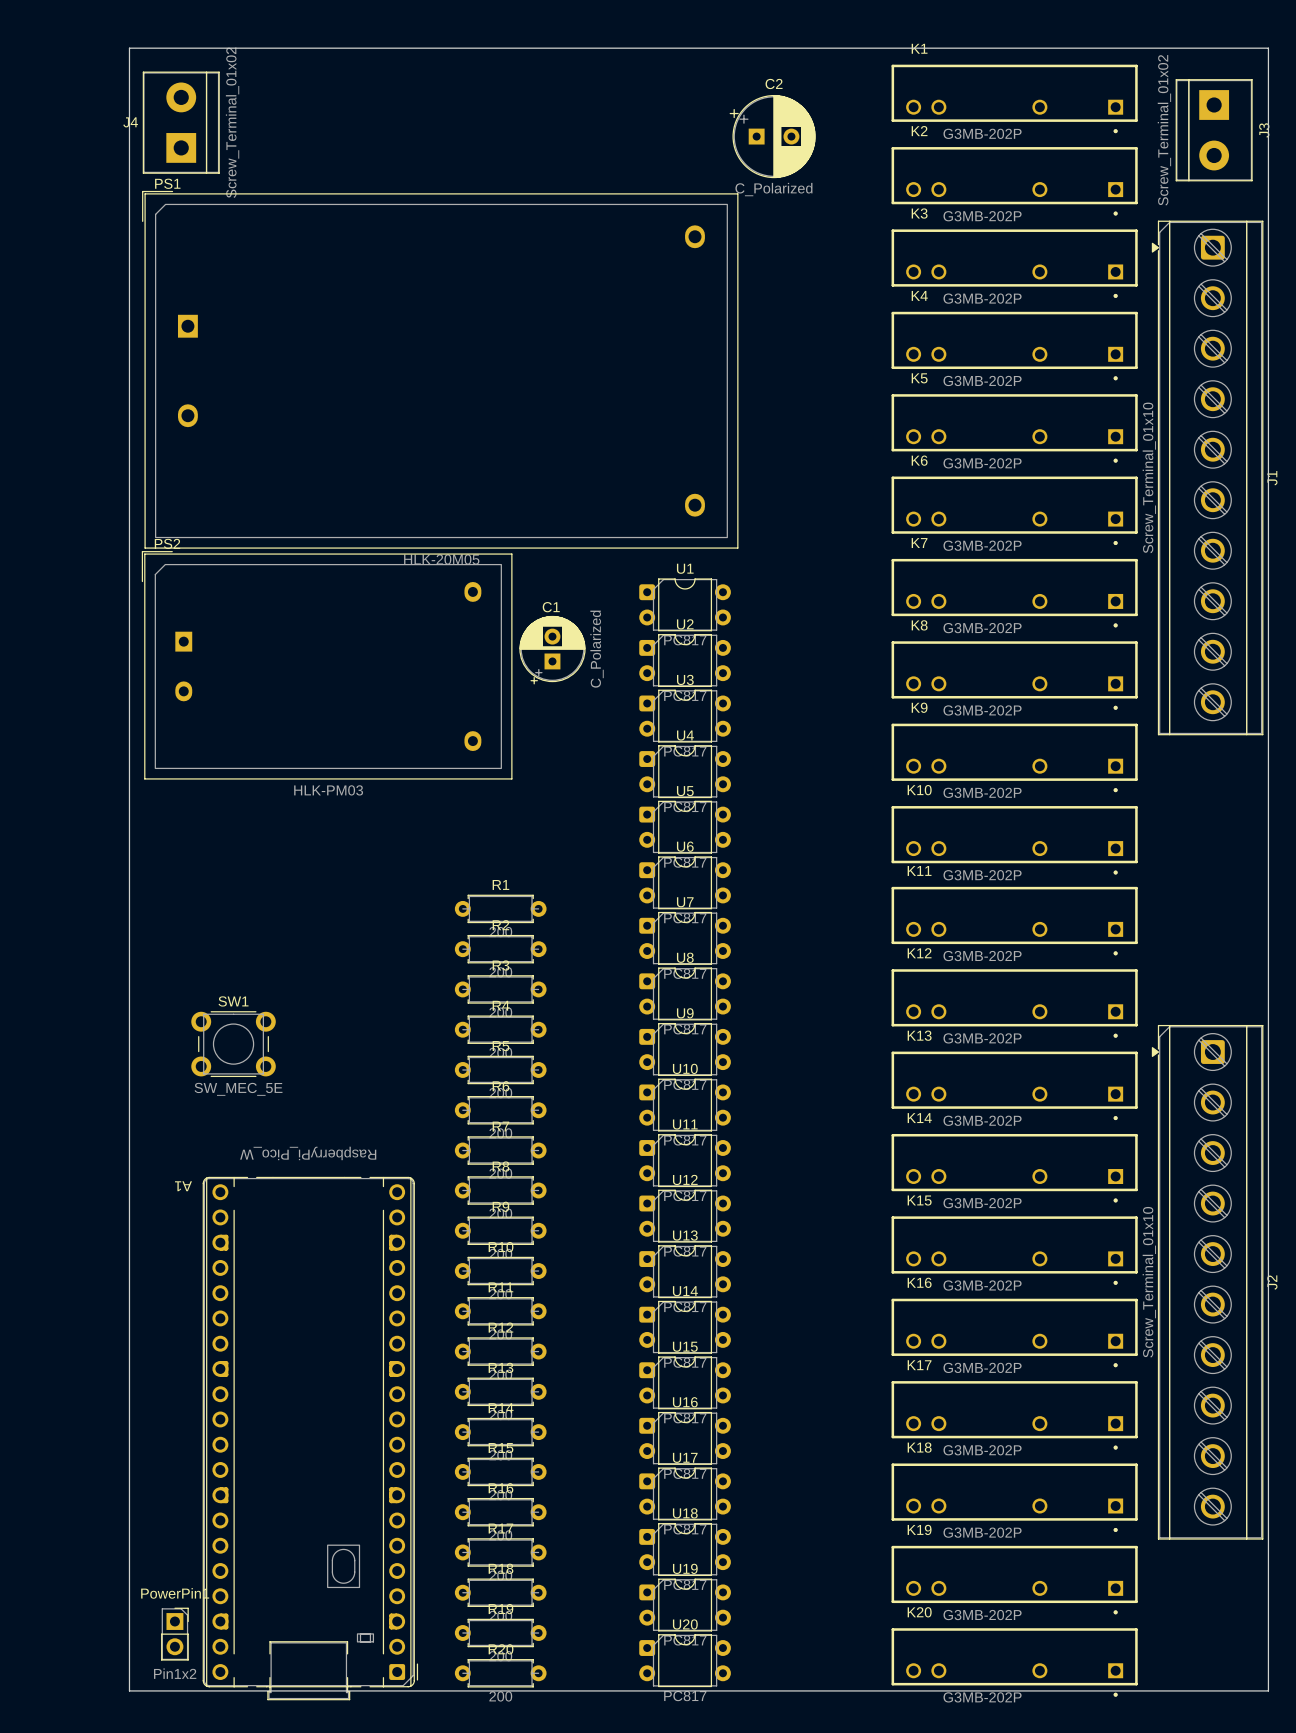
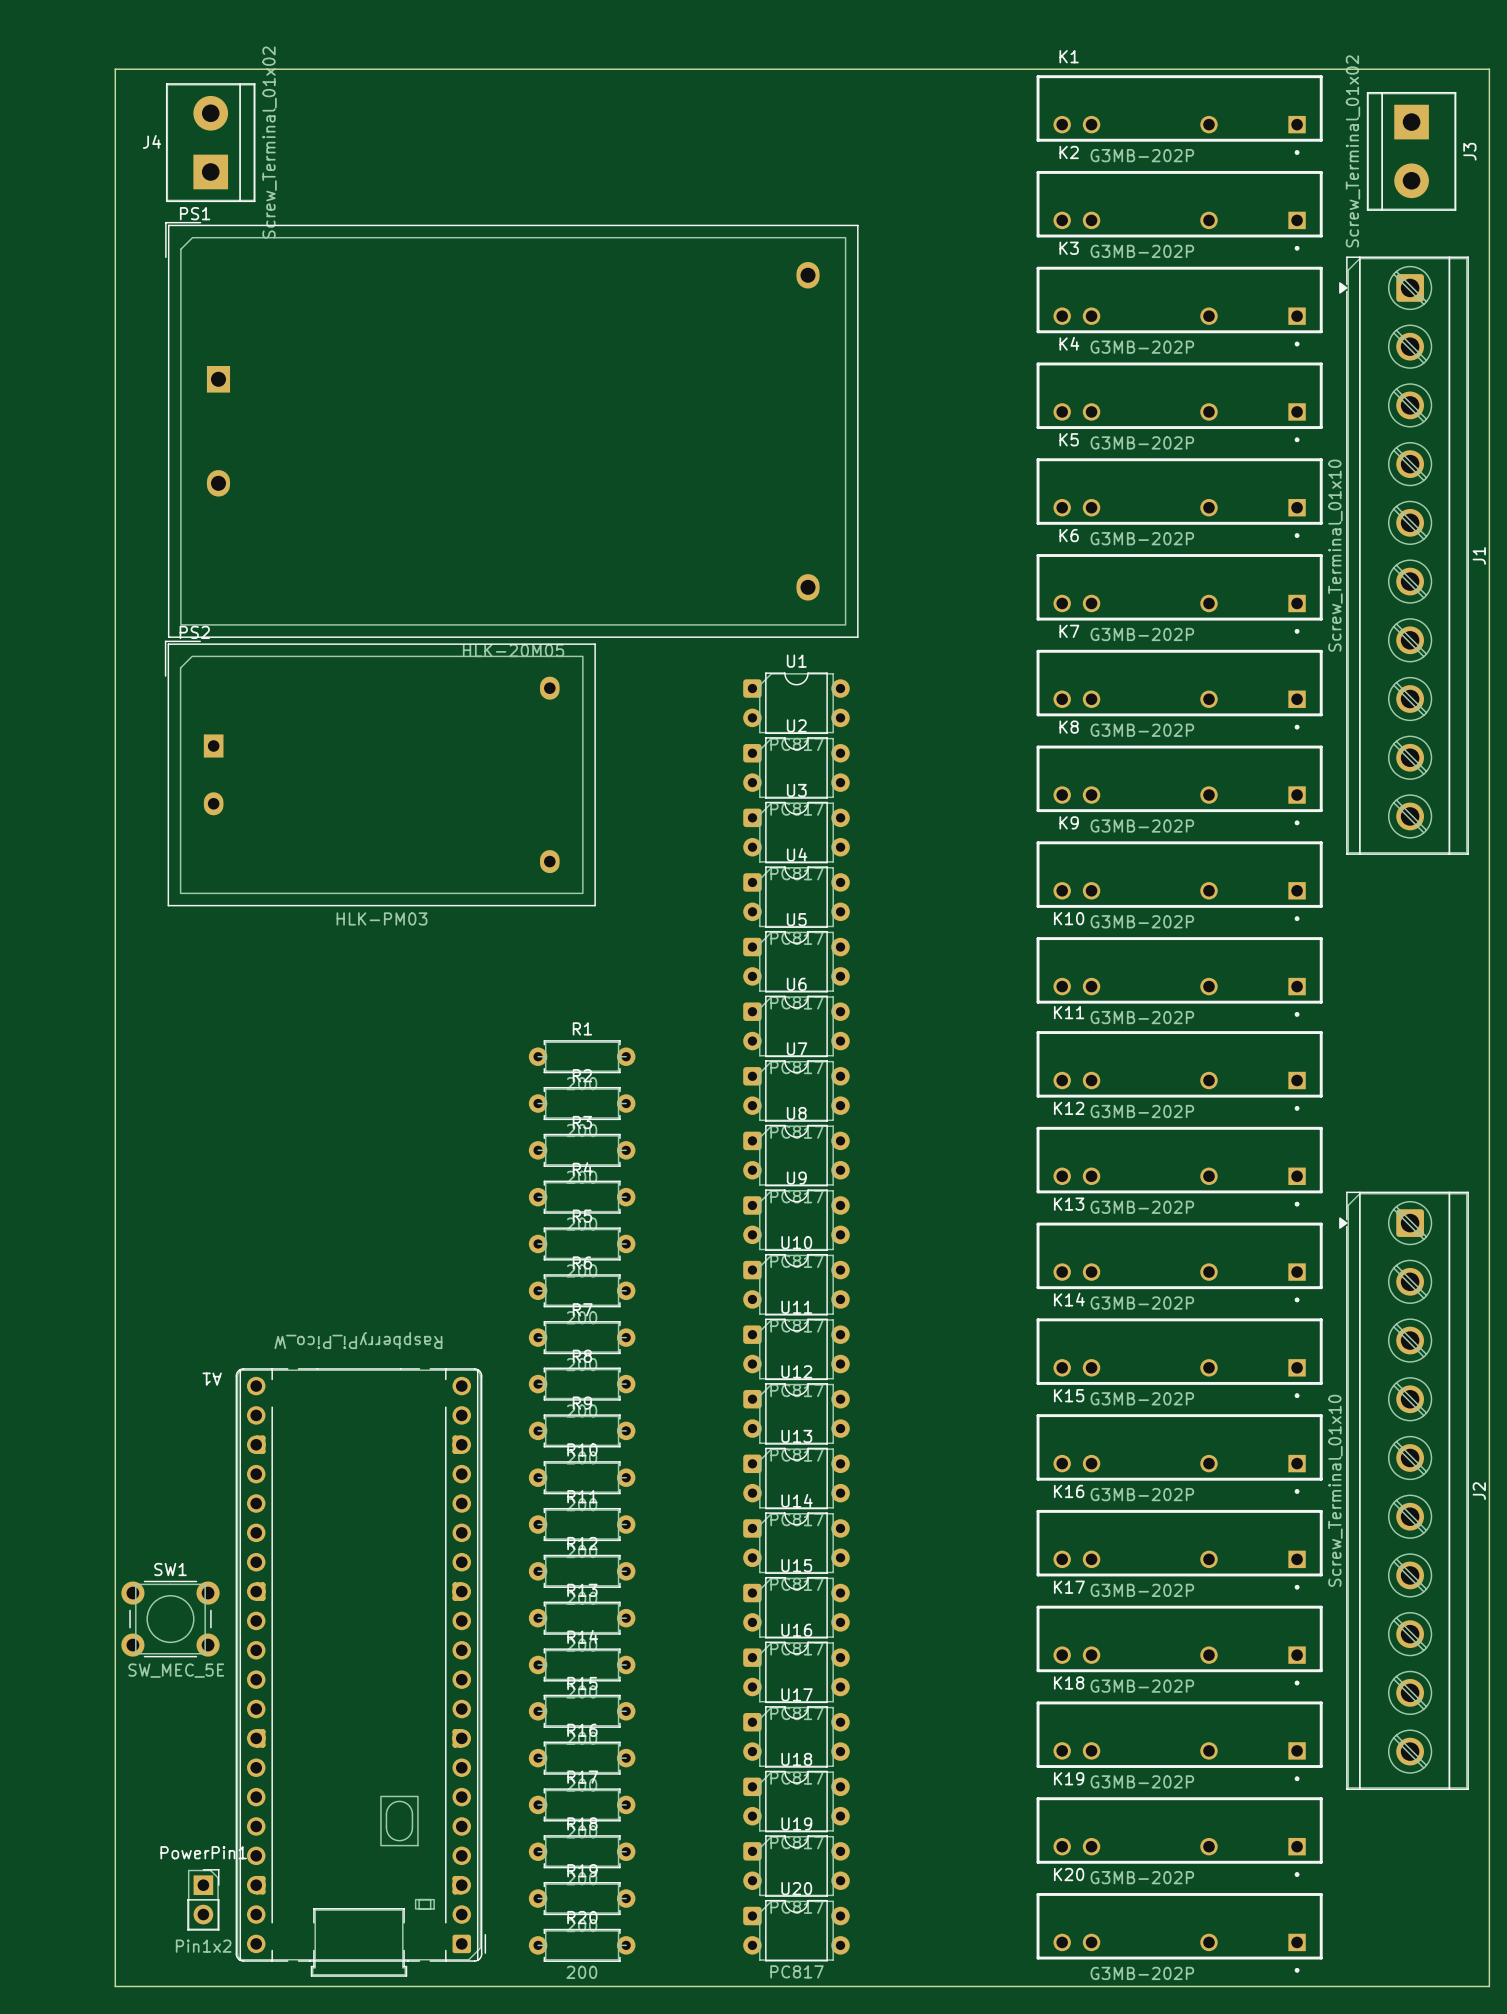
board edge: (129, 48) (1268, 48) (1268, 1690) (129, 1690) (129, 48) -> (115, 69) (115, 1986) (1489, 1986) (1489, 69) (115, 69)
C2: C_Polarized (772, 136) -> none
C1: C_Polarized (552, 650) -> none
SW1 position: (233, 1044) -> (170, 1619)

